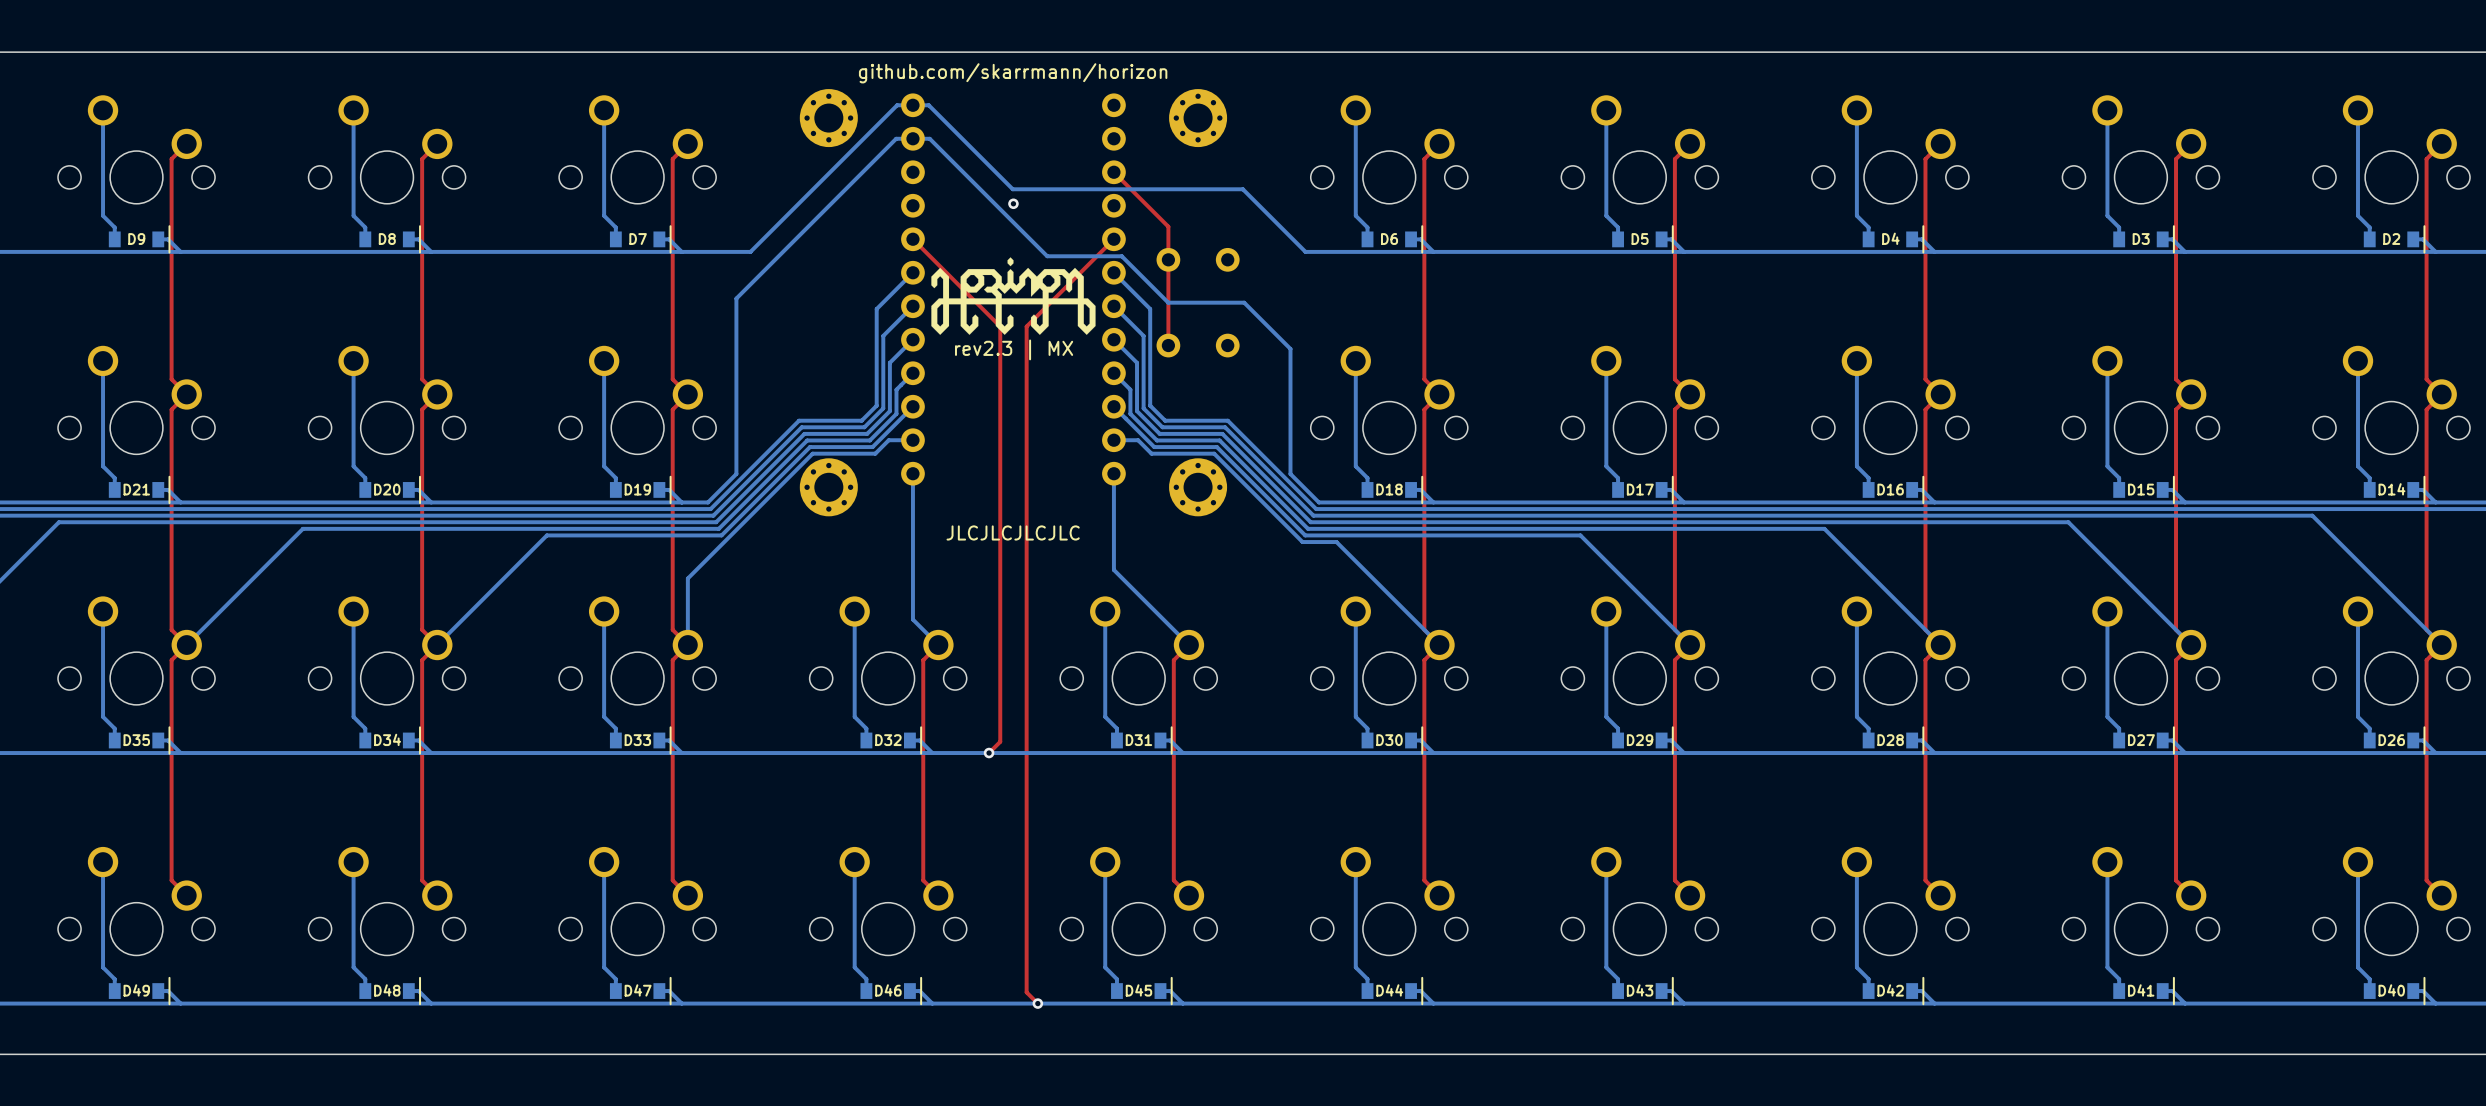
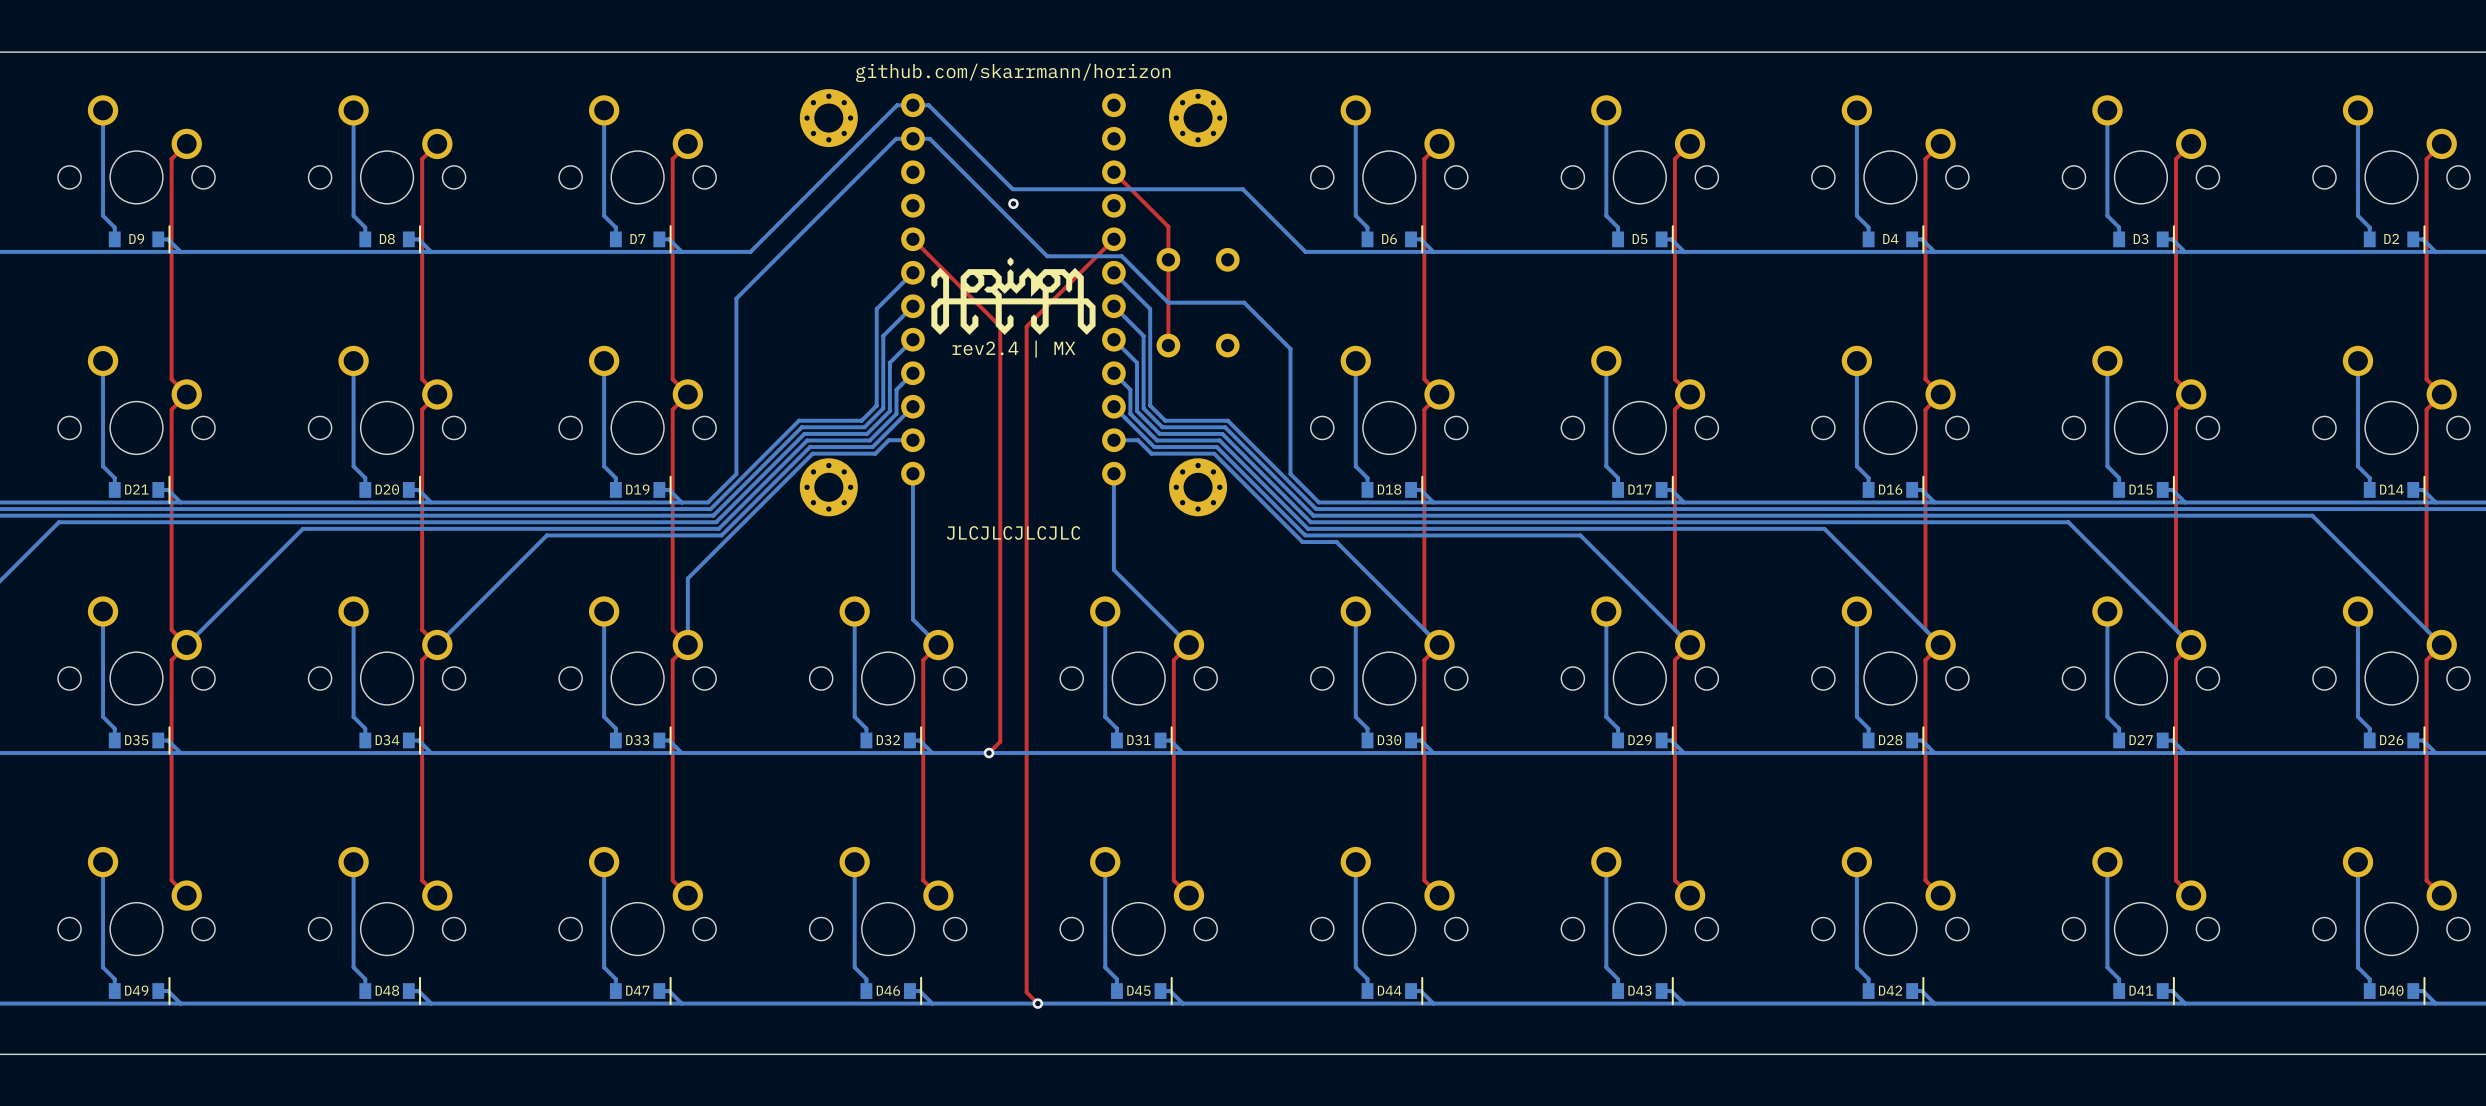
text: rev2.3 | MX (1014, 349) -> rev2.4 | MX (1013, 349)

